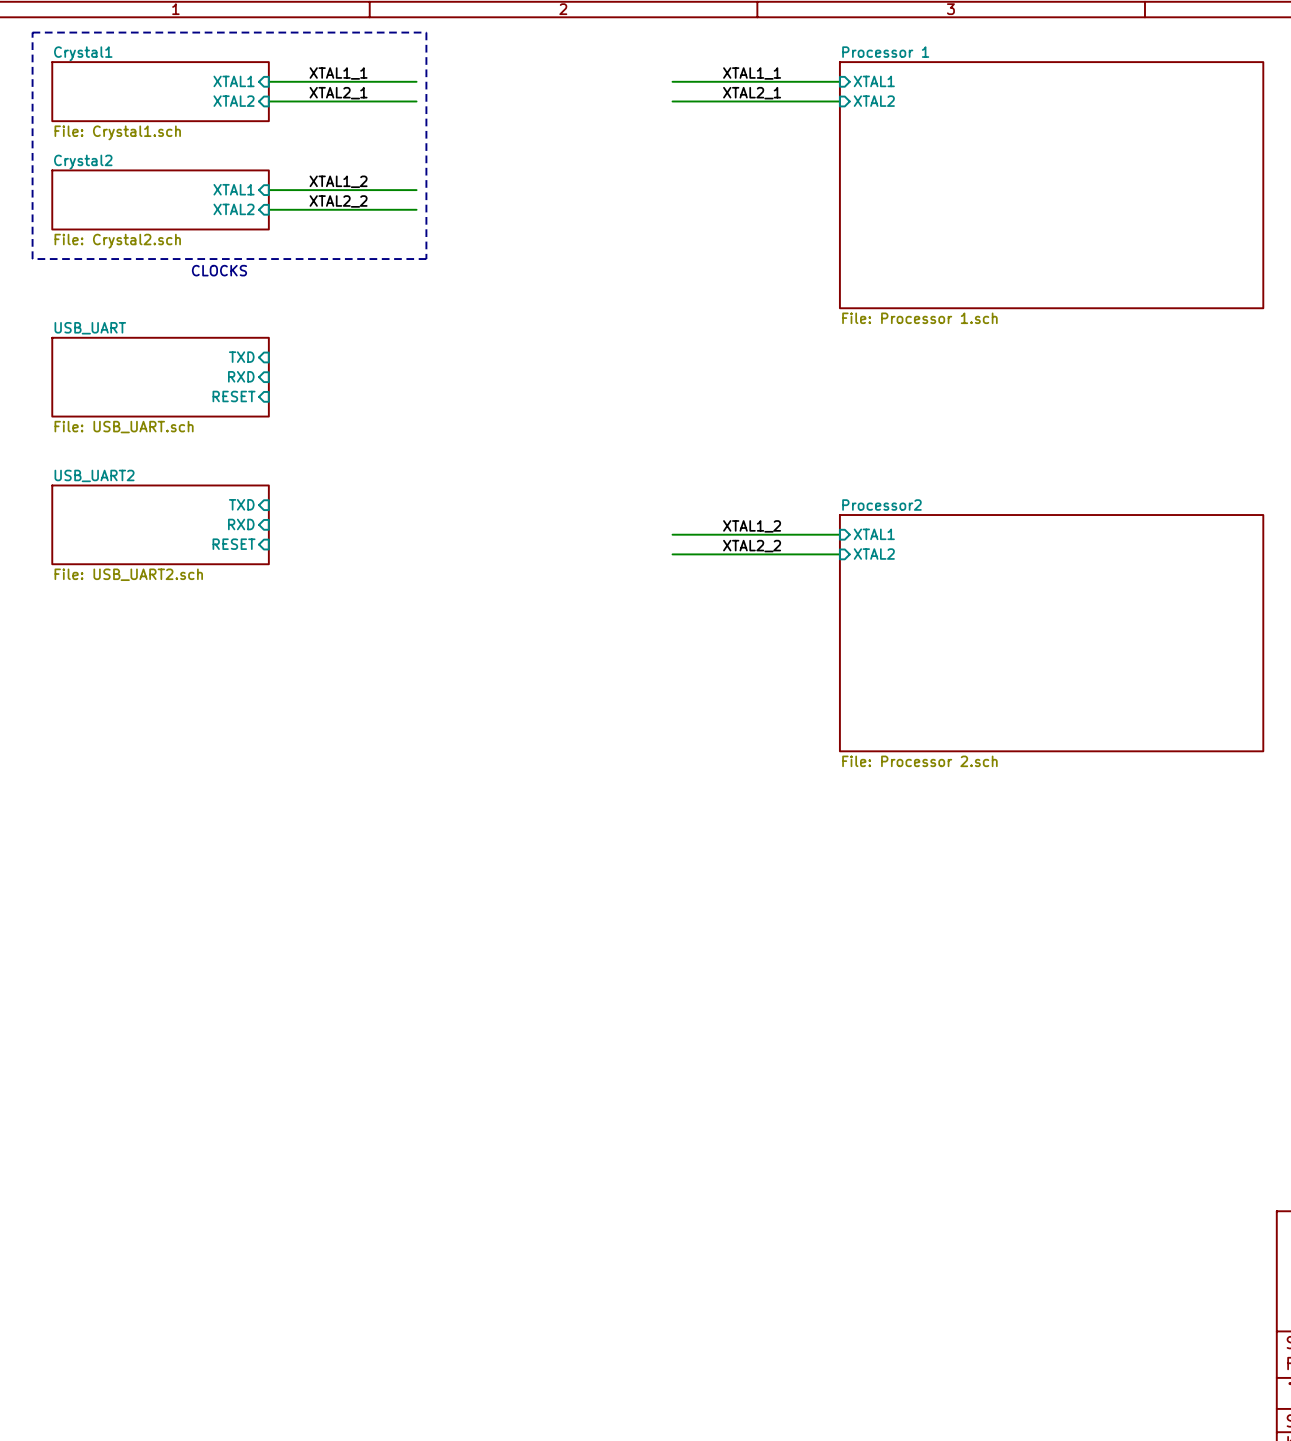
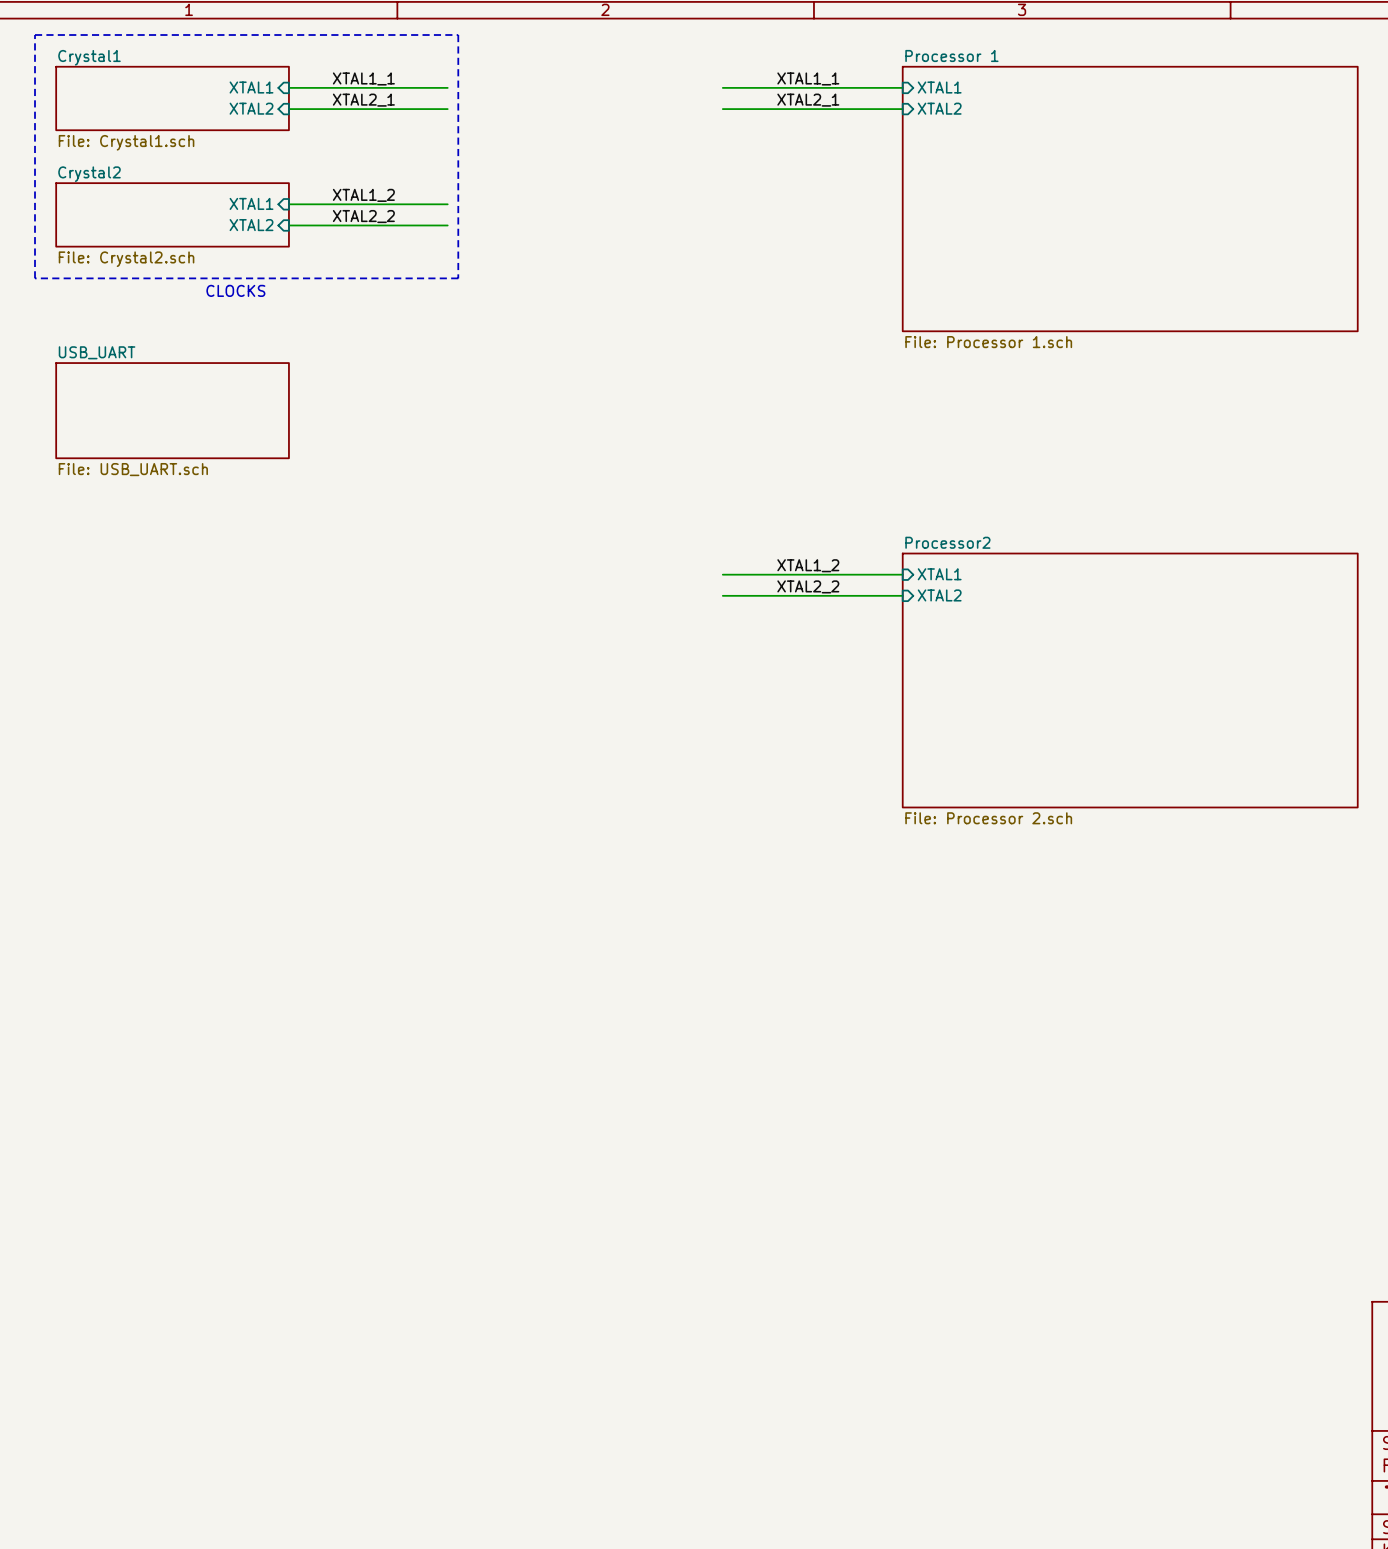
sheet USB_UART shape: [52, 337, 269, 417] -> [56, 363, 289, 459]
sheet pin: TXD (241, 357) -> none
sheet pin: RXD (241, 376) -> none
sheet pin: RESET (234, 396) -> none
sheet pin: TXD (241, 504) -> none
sheet USB_UART2: File: USB_UART2.sch (160, 524) -> none
sheet pin: RXD (241, 524) -> none
sheet pin: RESET (234, 544) -> none

